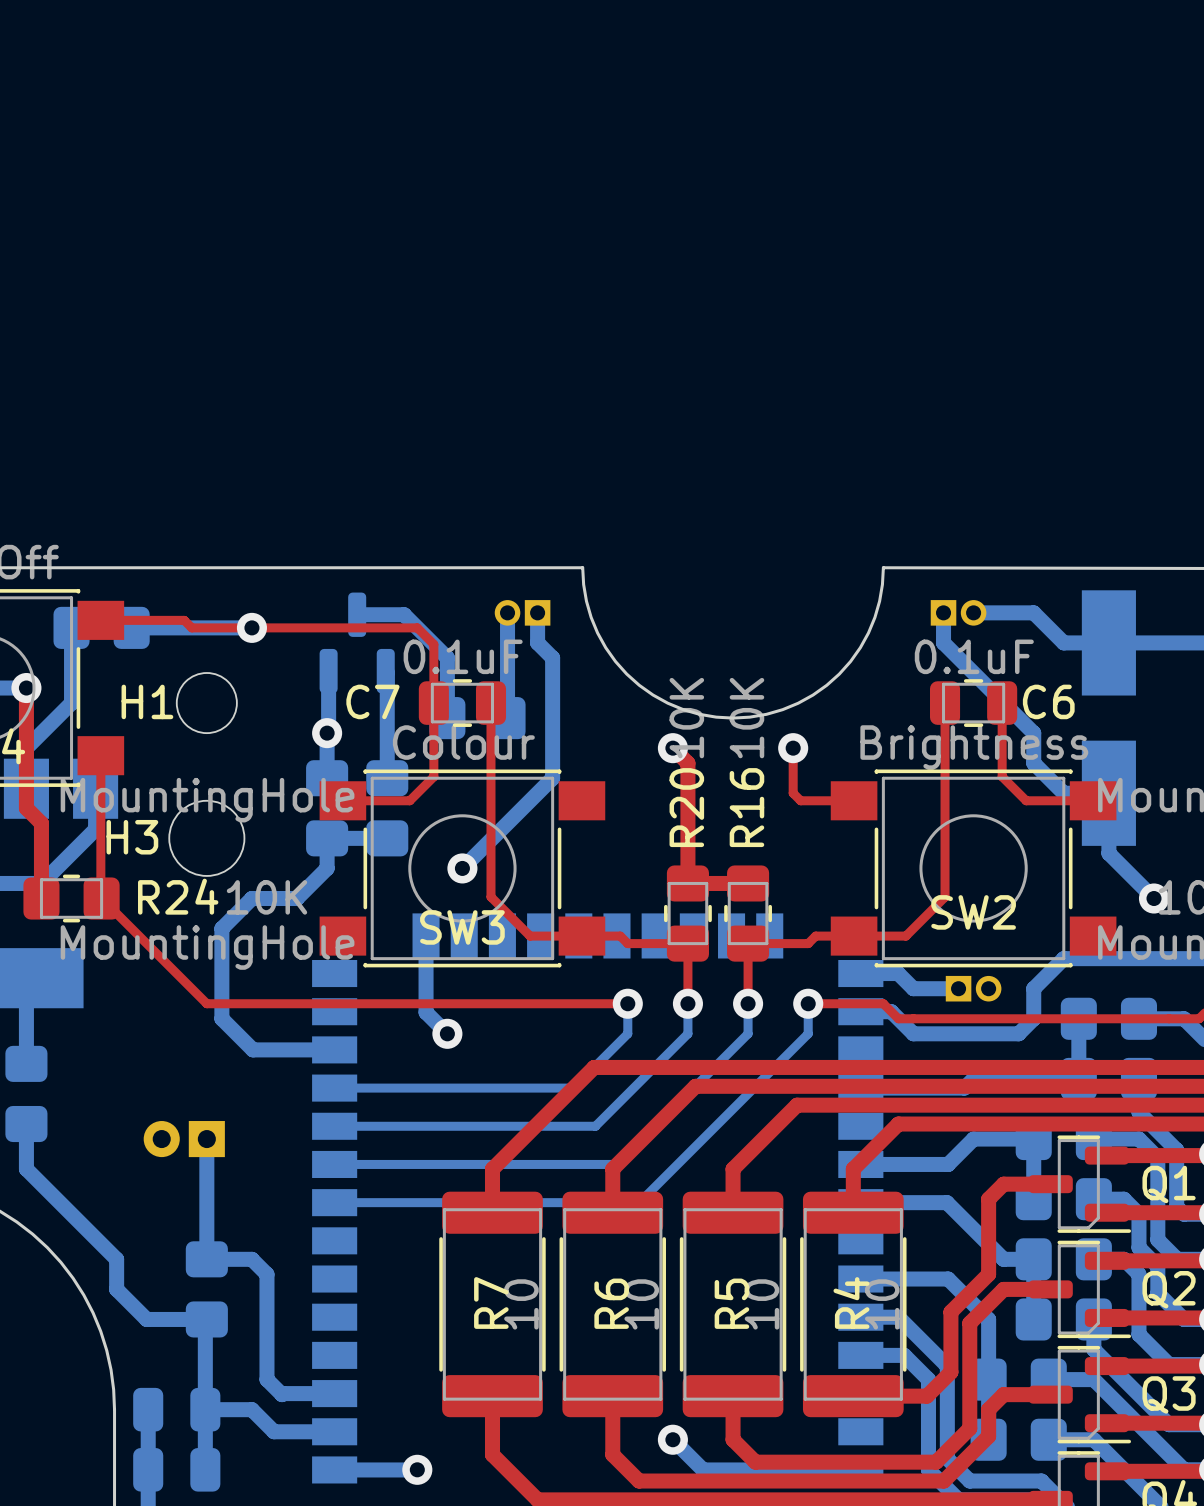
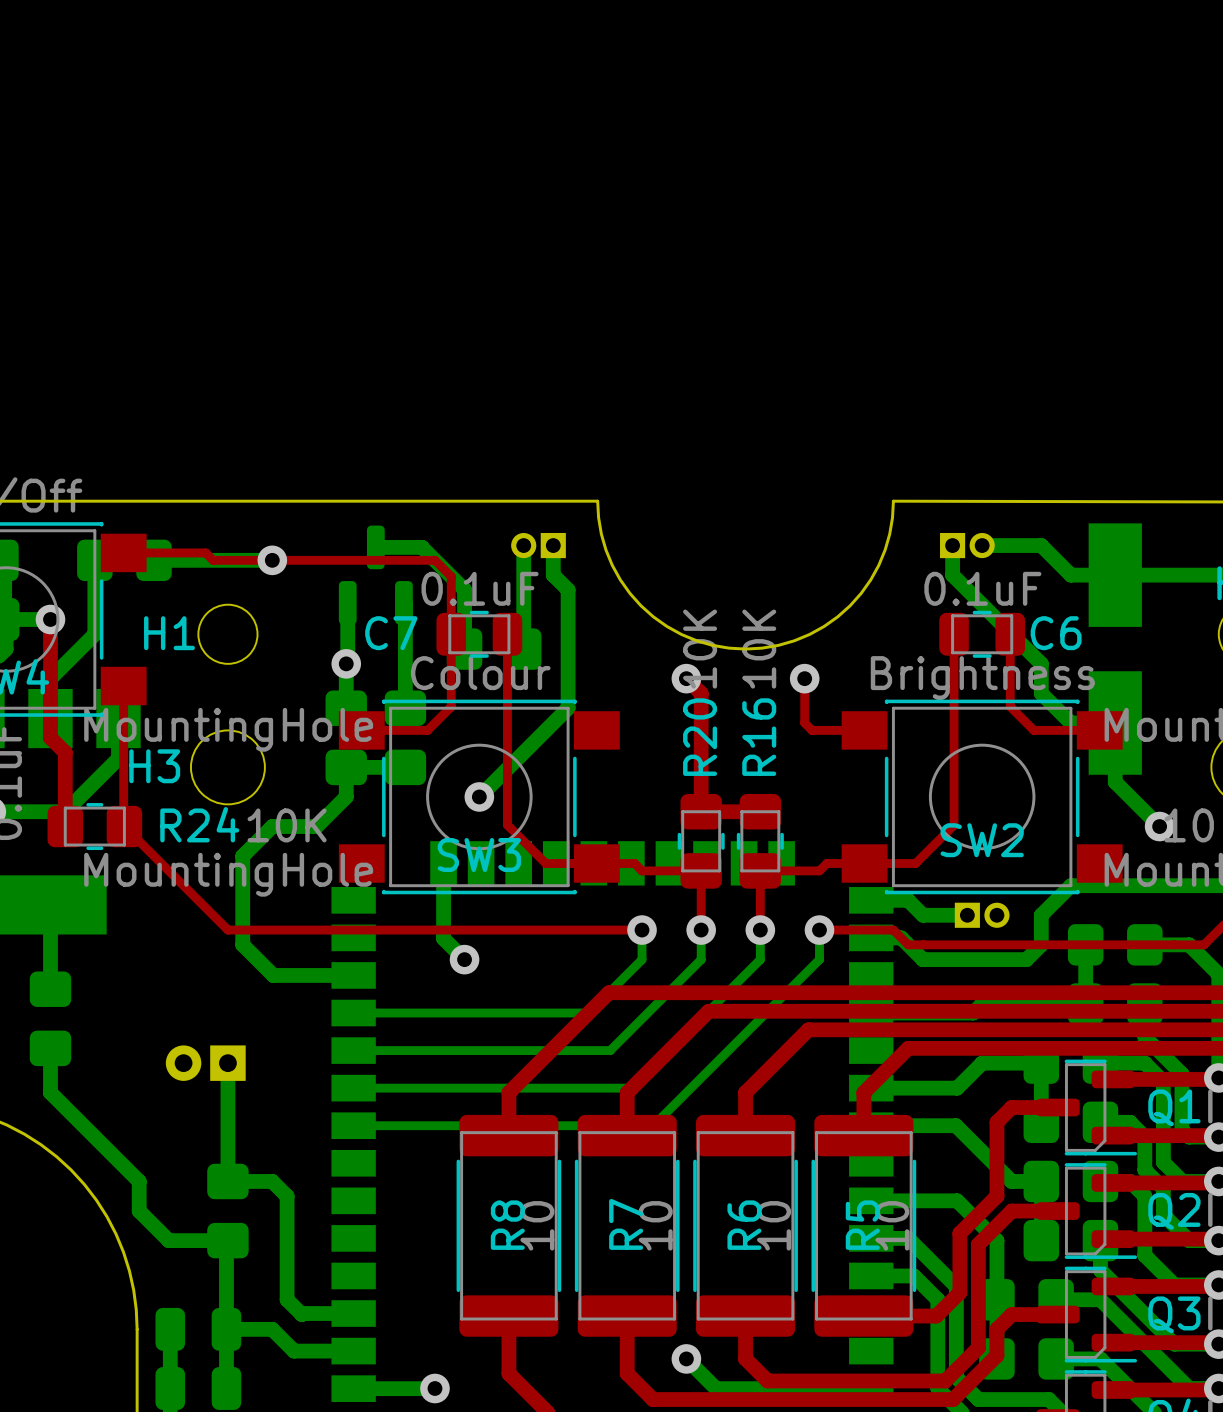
R7 name: R7 (491, 1303) -> R8 (507, 1225)
R6 name: R6 (611, 1303) -> R7 (626, 1224)
R5 name: R5 (731, 1303) -> R6 (744, 1225)
R4 name: R4 (851, 1303) -> R5 (862, 1225)

